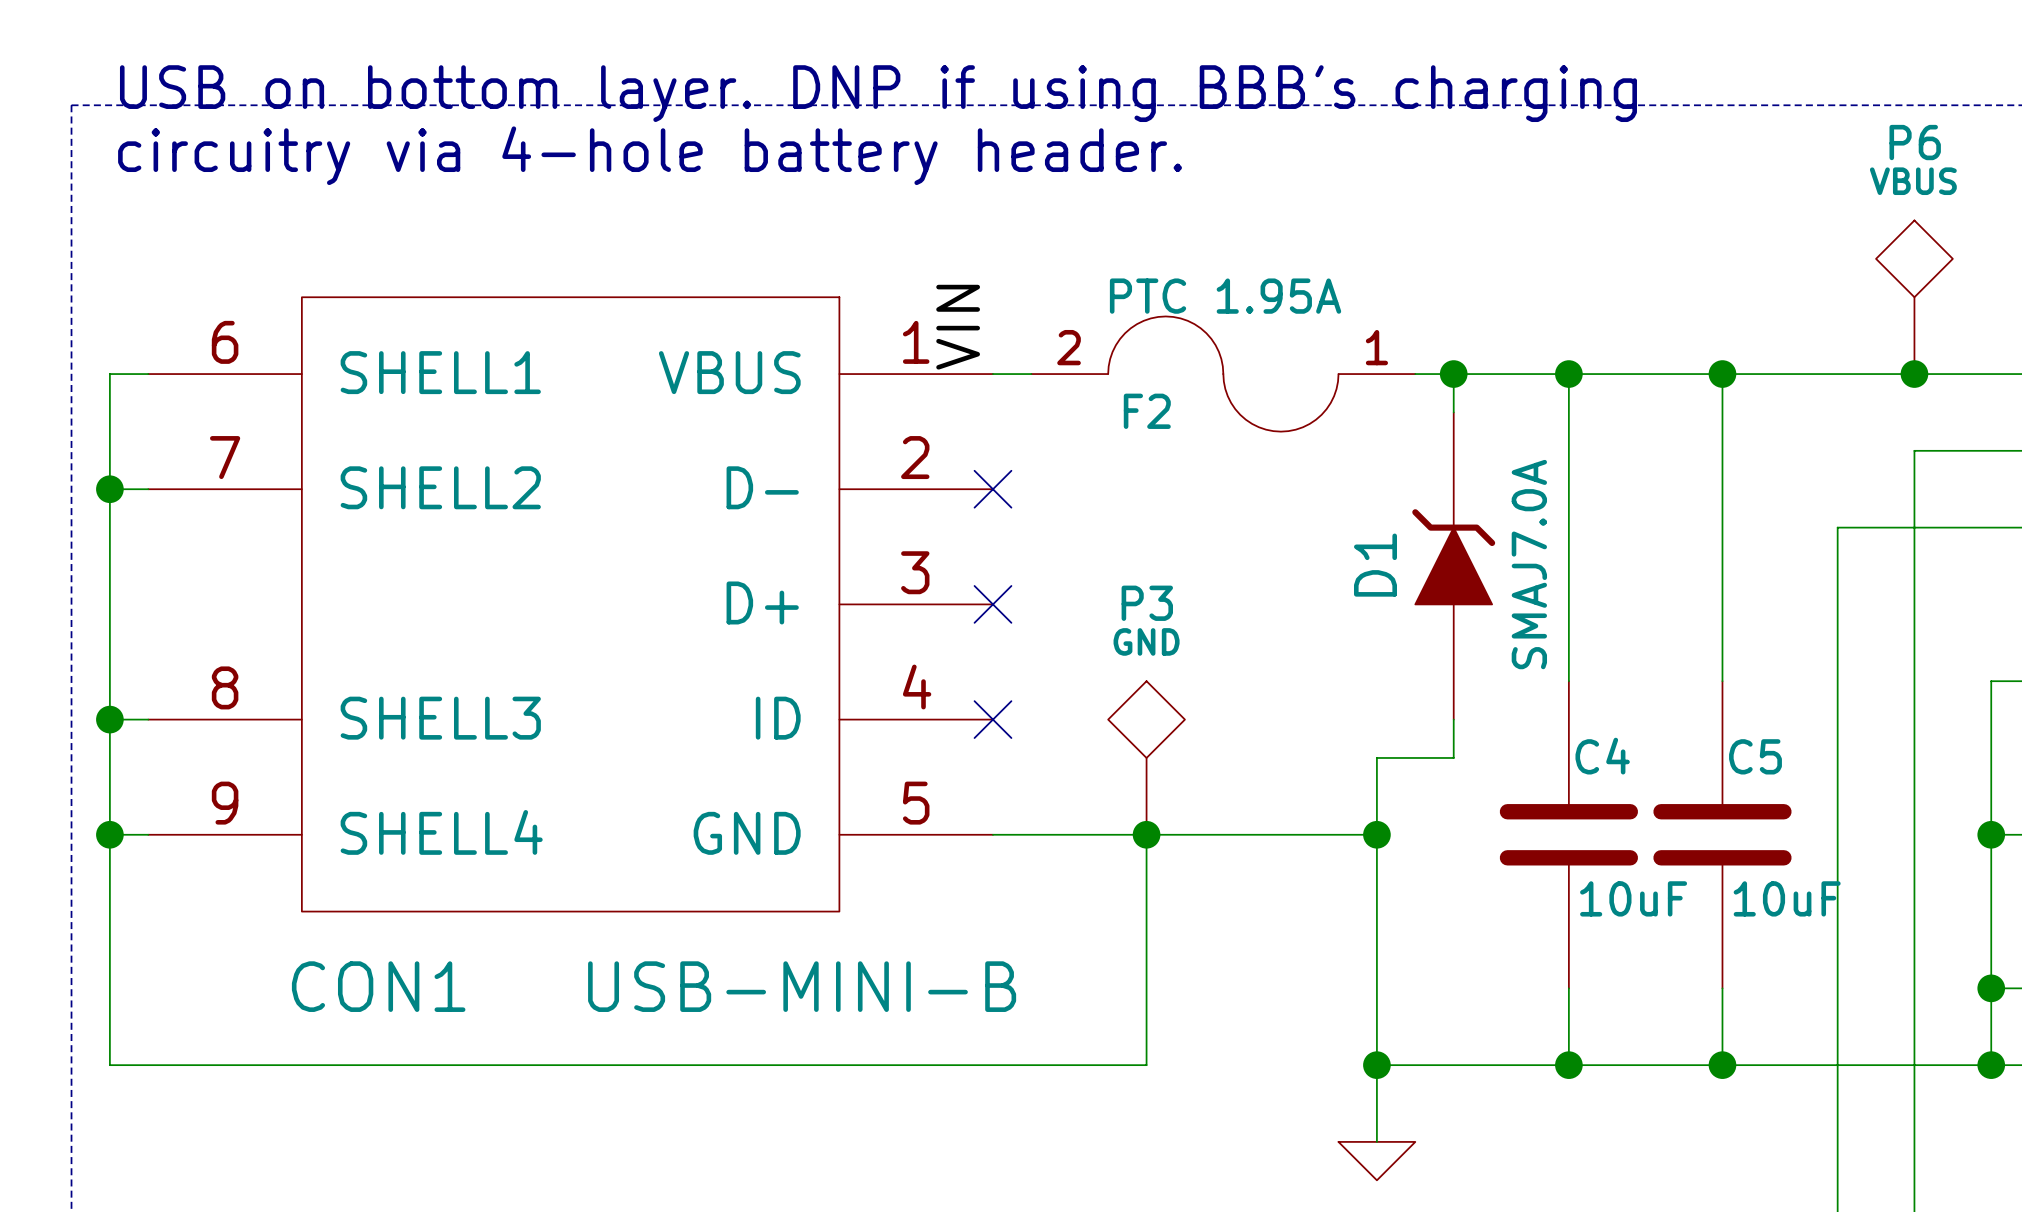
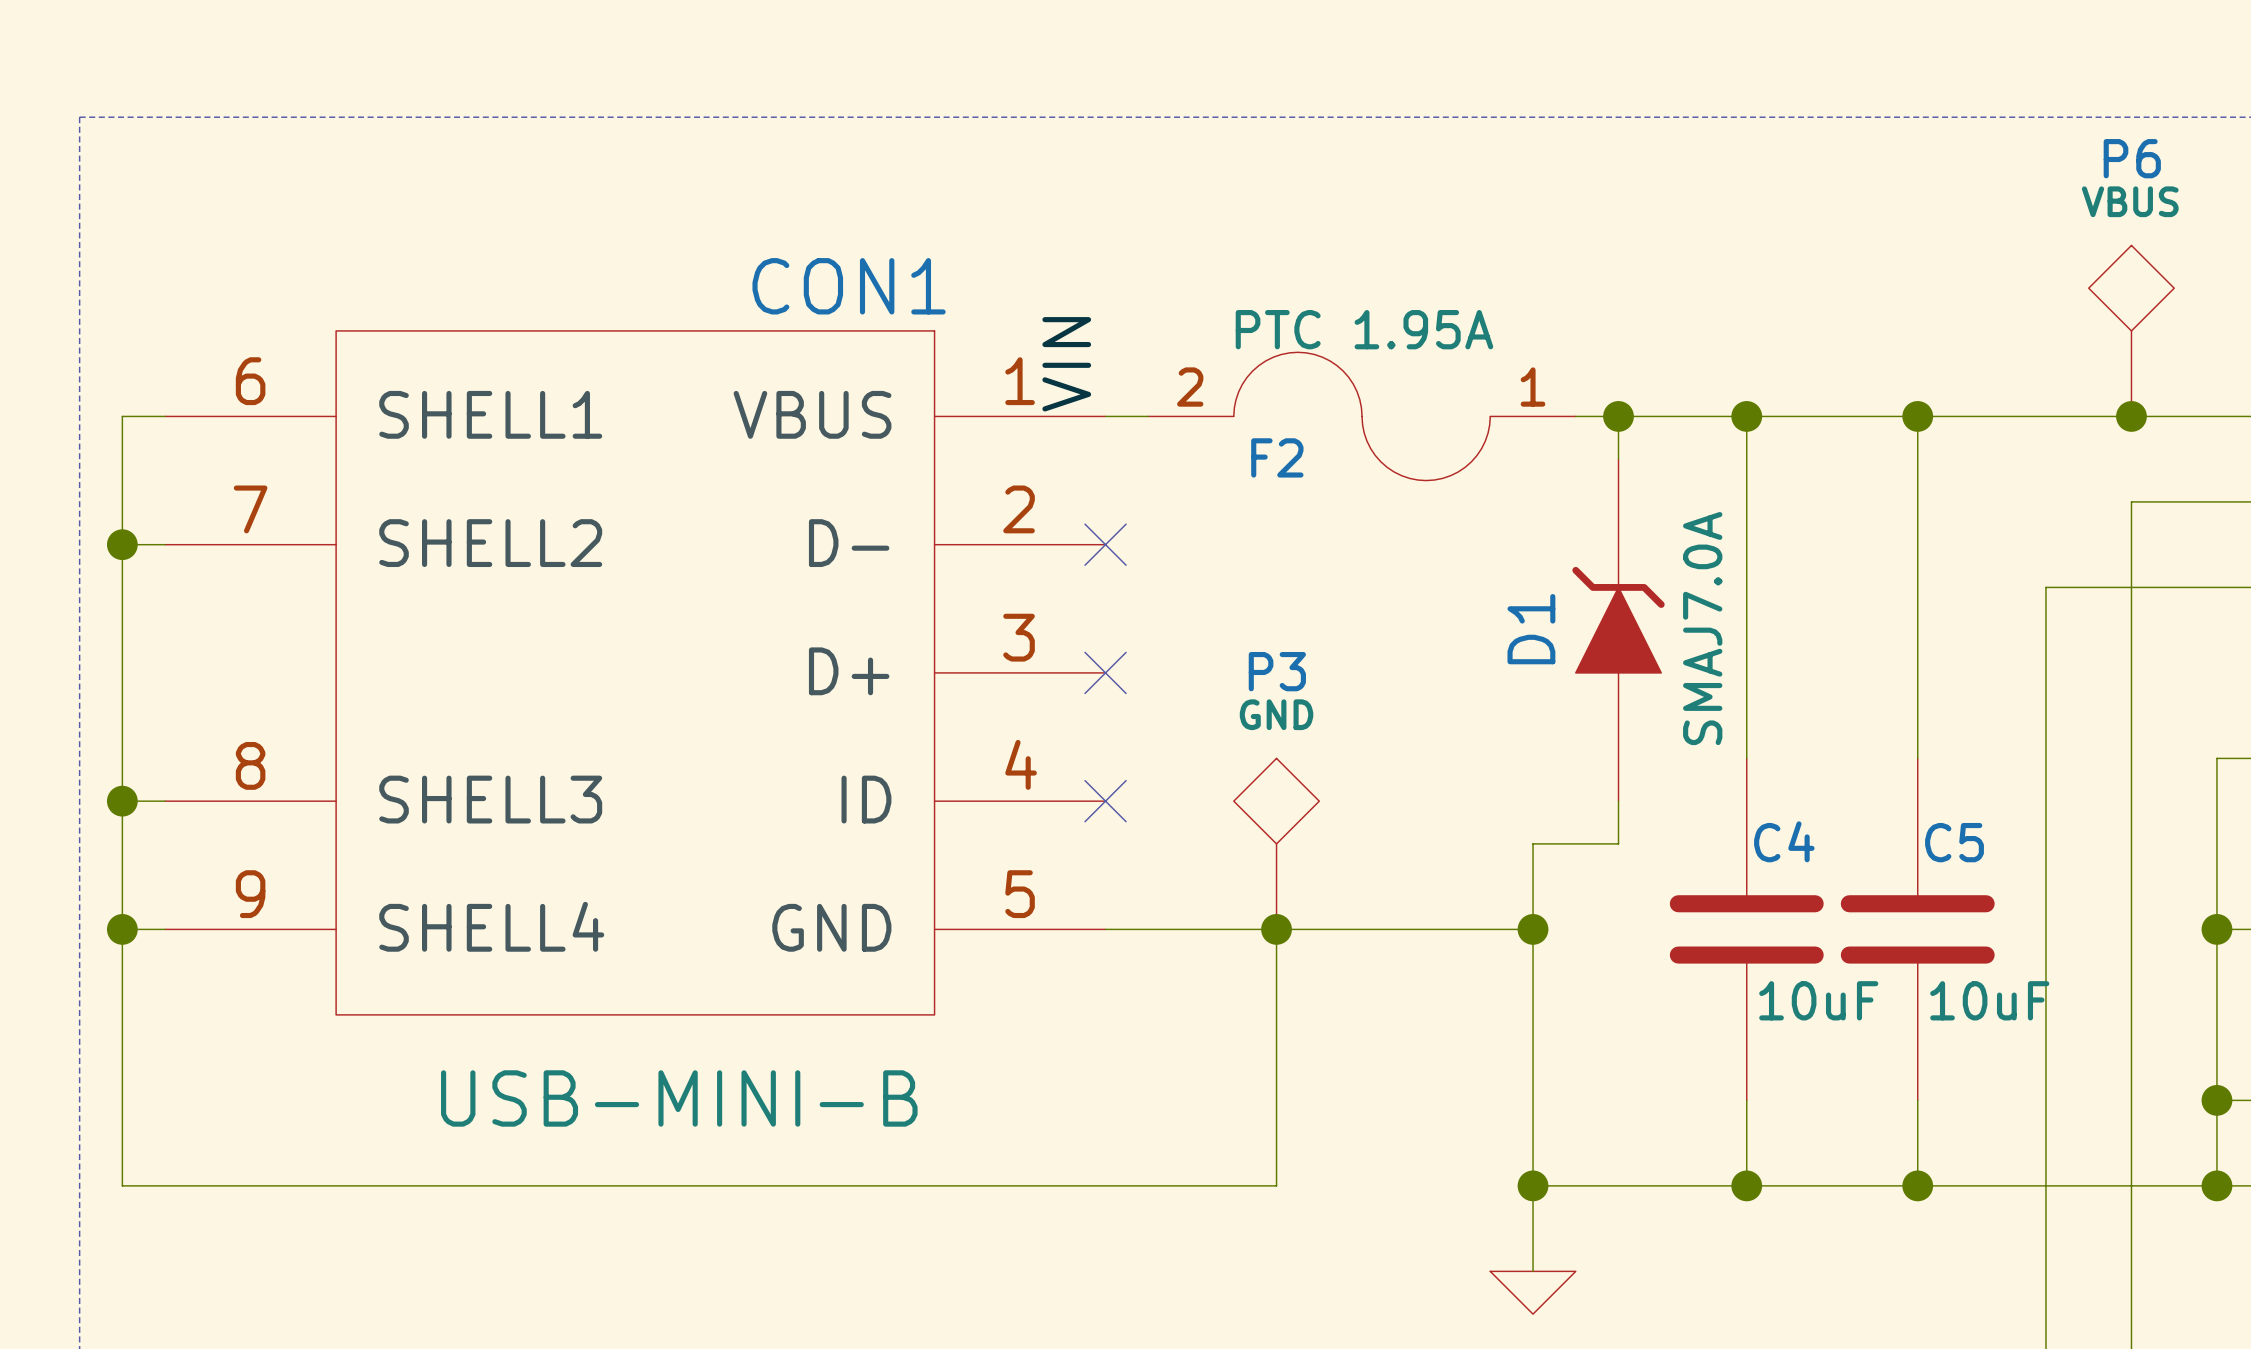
text: USB on bottom layer. DNP if using BBB's charging (878, 93) -> none
text: circuitry via 4-hole battery header. (650, 155) -> none
CON1 name position: CON1 (378, 986) -> CON1 (849, 286)
CON1 value position: USB-MINI-B (802, 986) -> USB-MINI-B (679, 1098)

